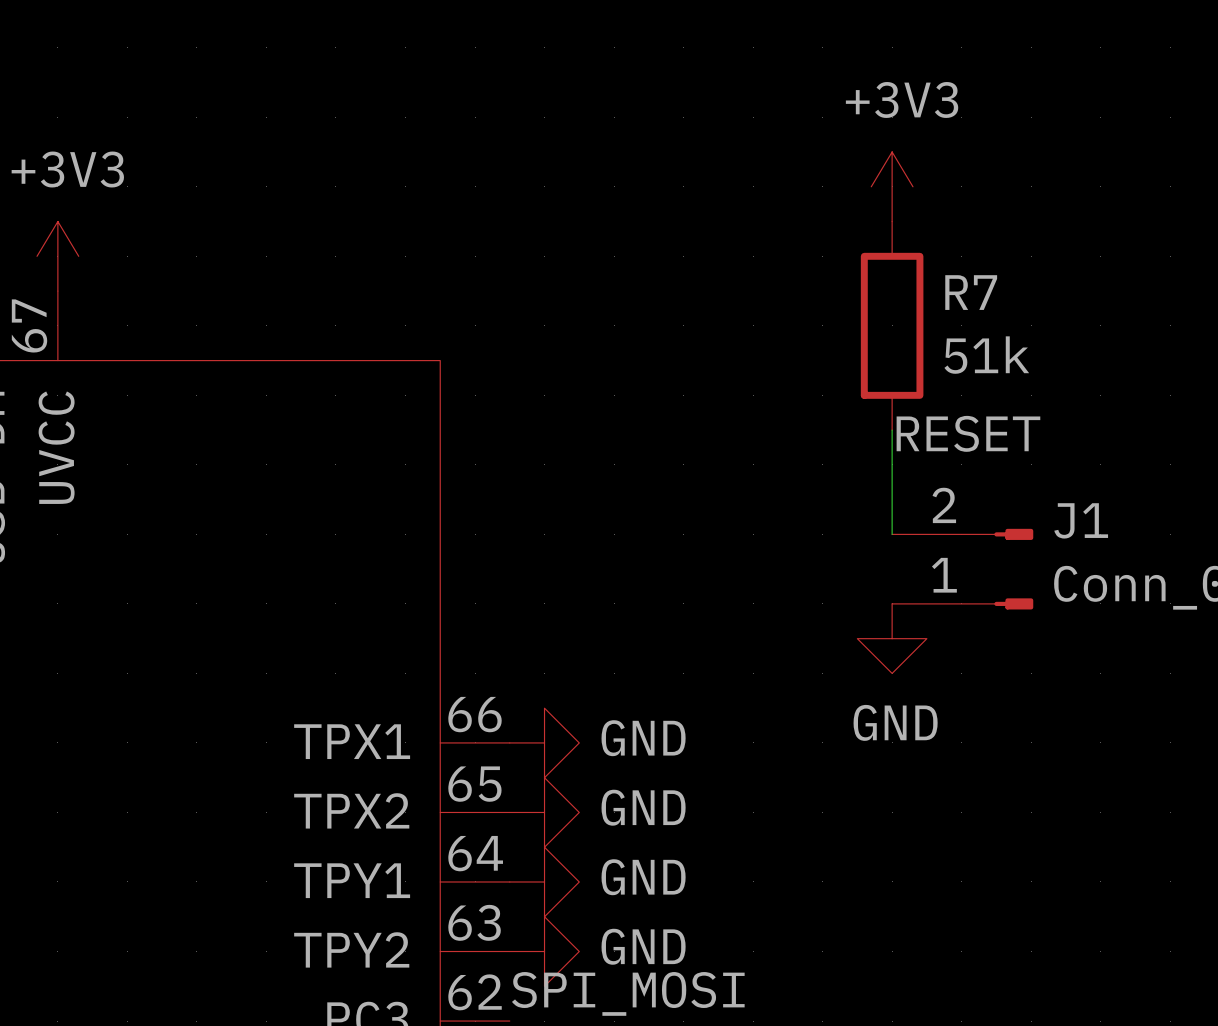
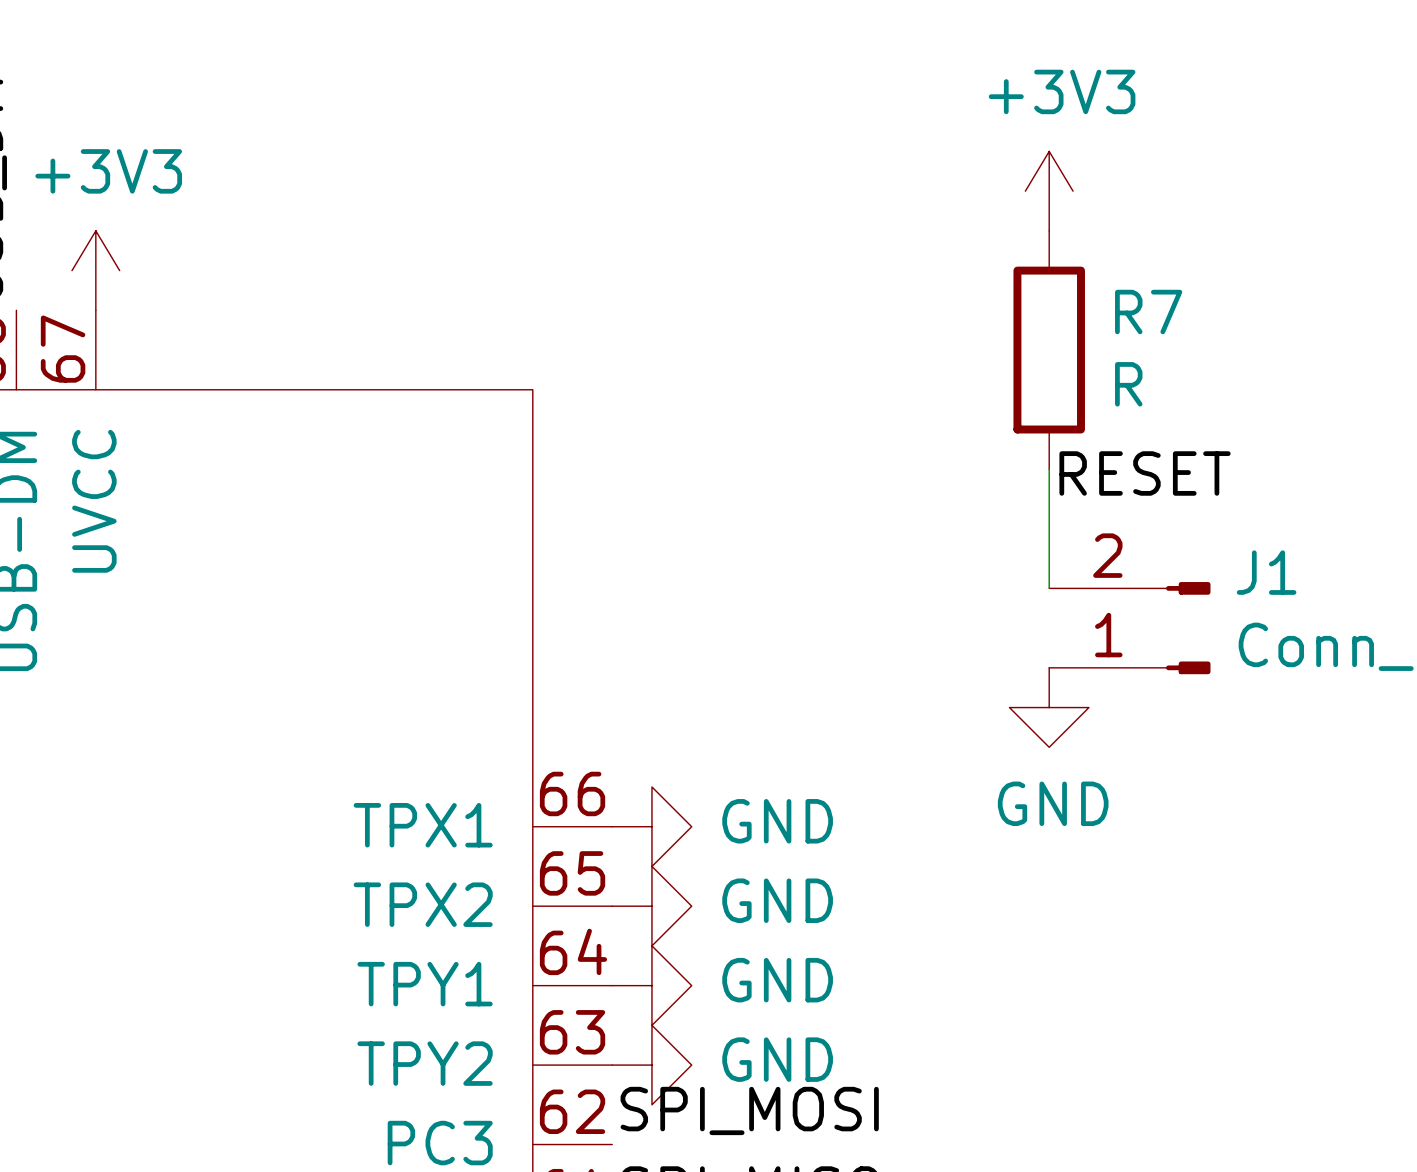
R7 value: 51k (986, 355) -> R (1128, 384)

